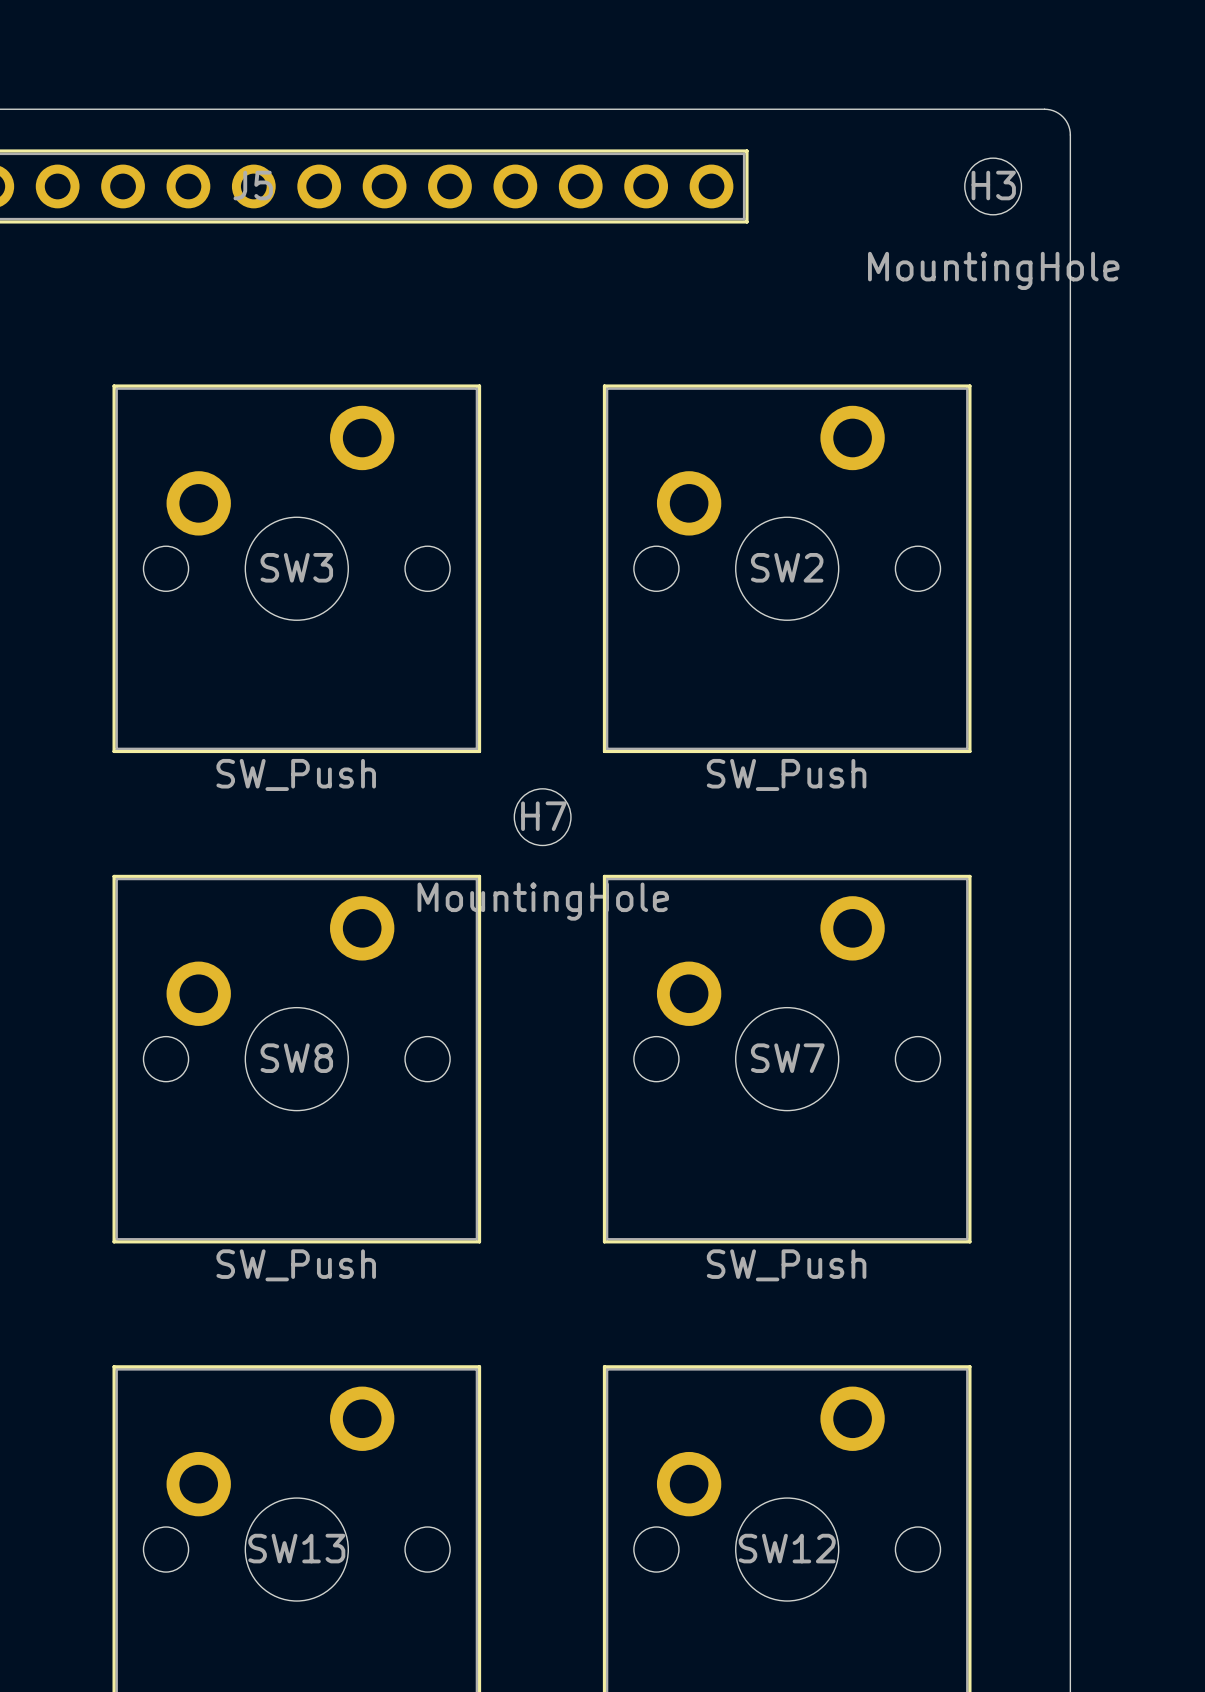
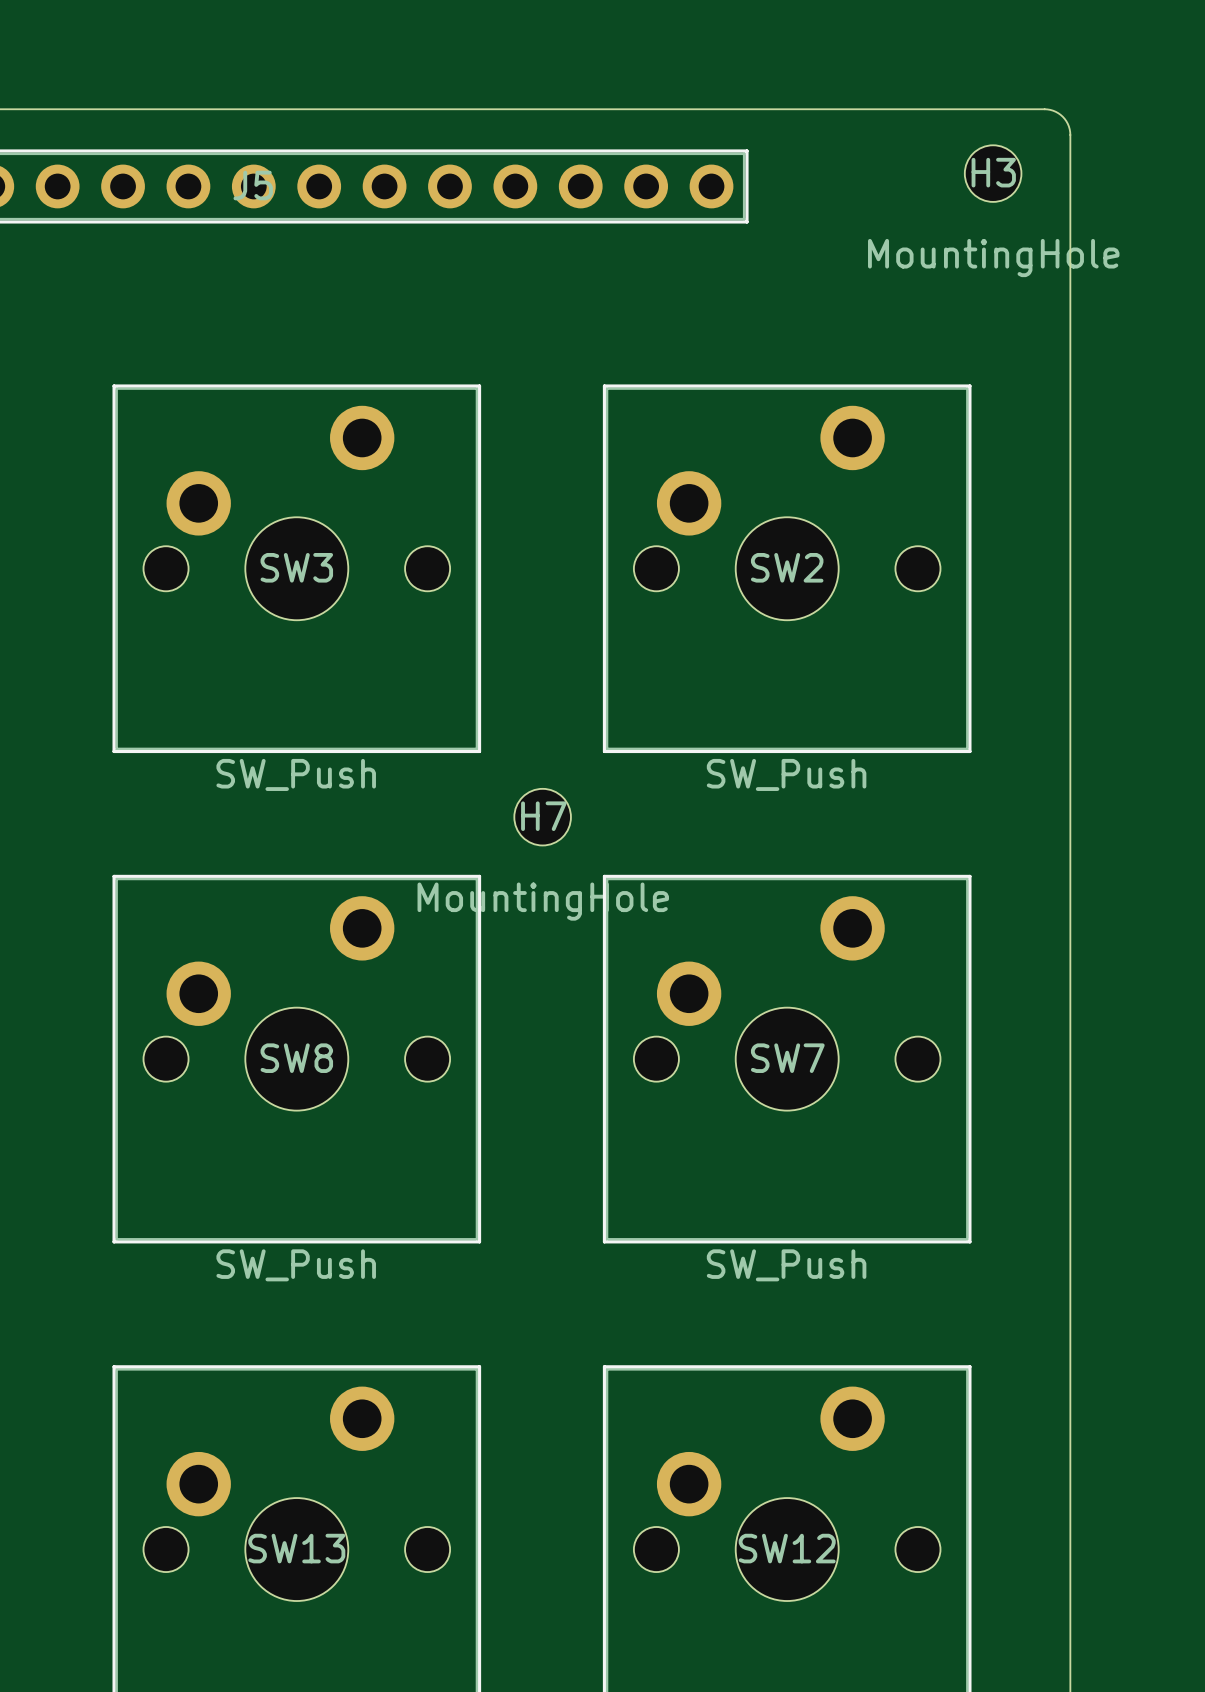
H3 position: (993, 186) -> (993, 173)

